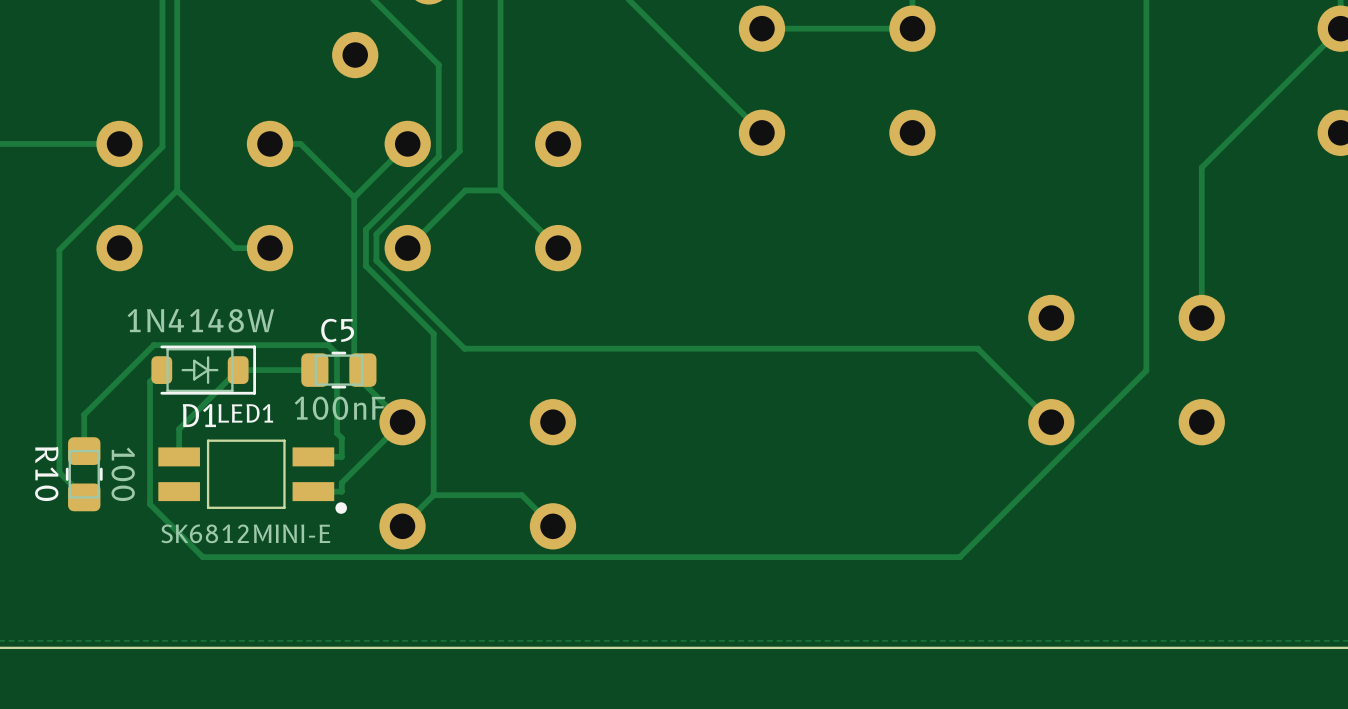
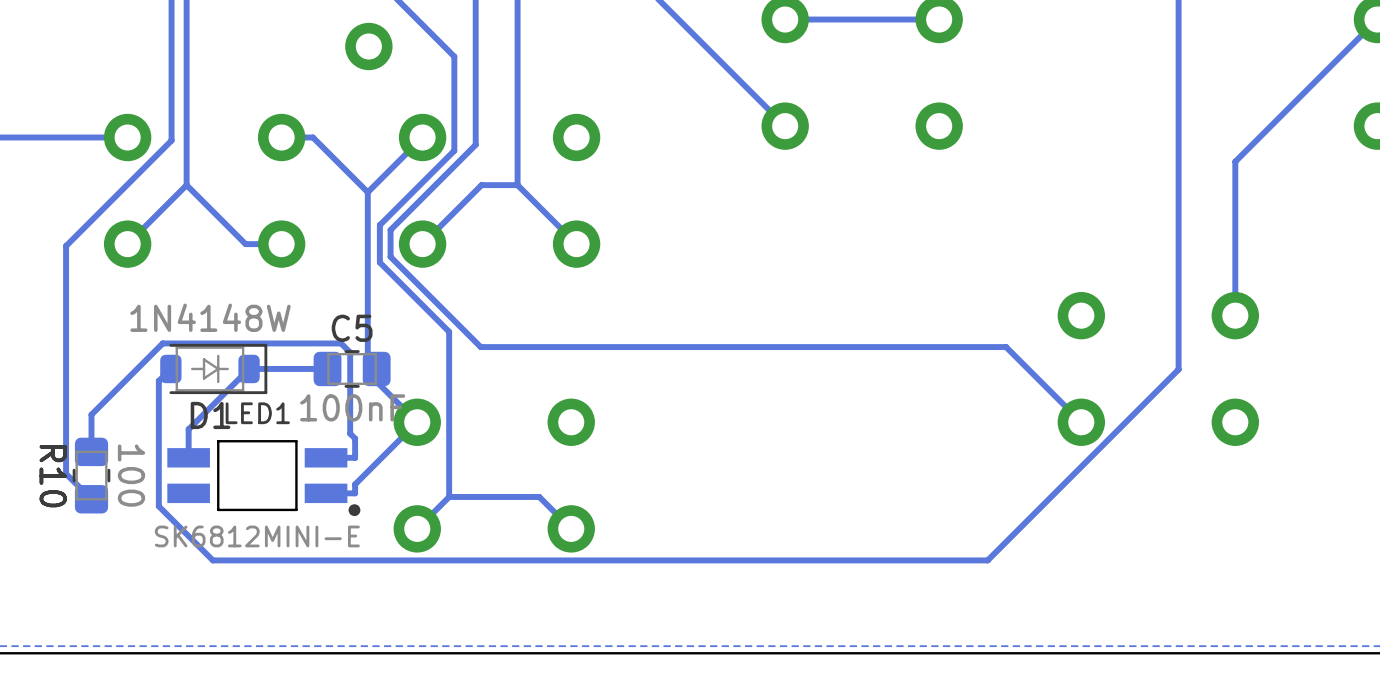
text: none -> R10 (53, 476)

